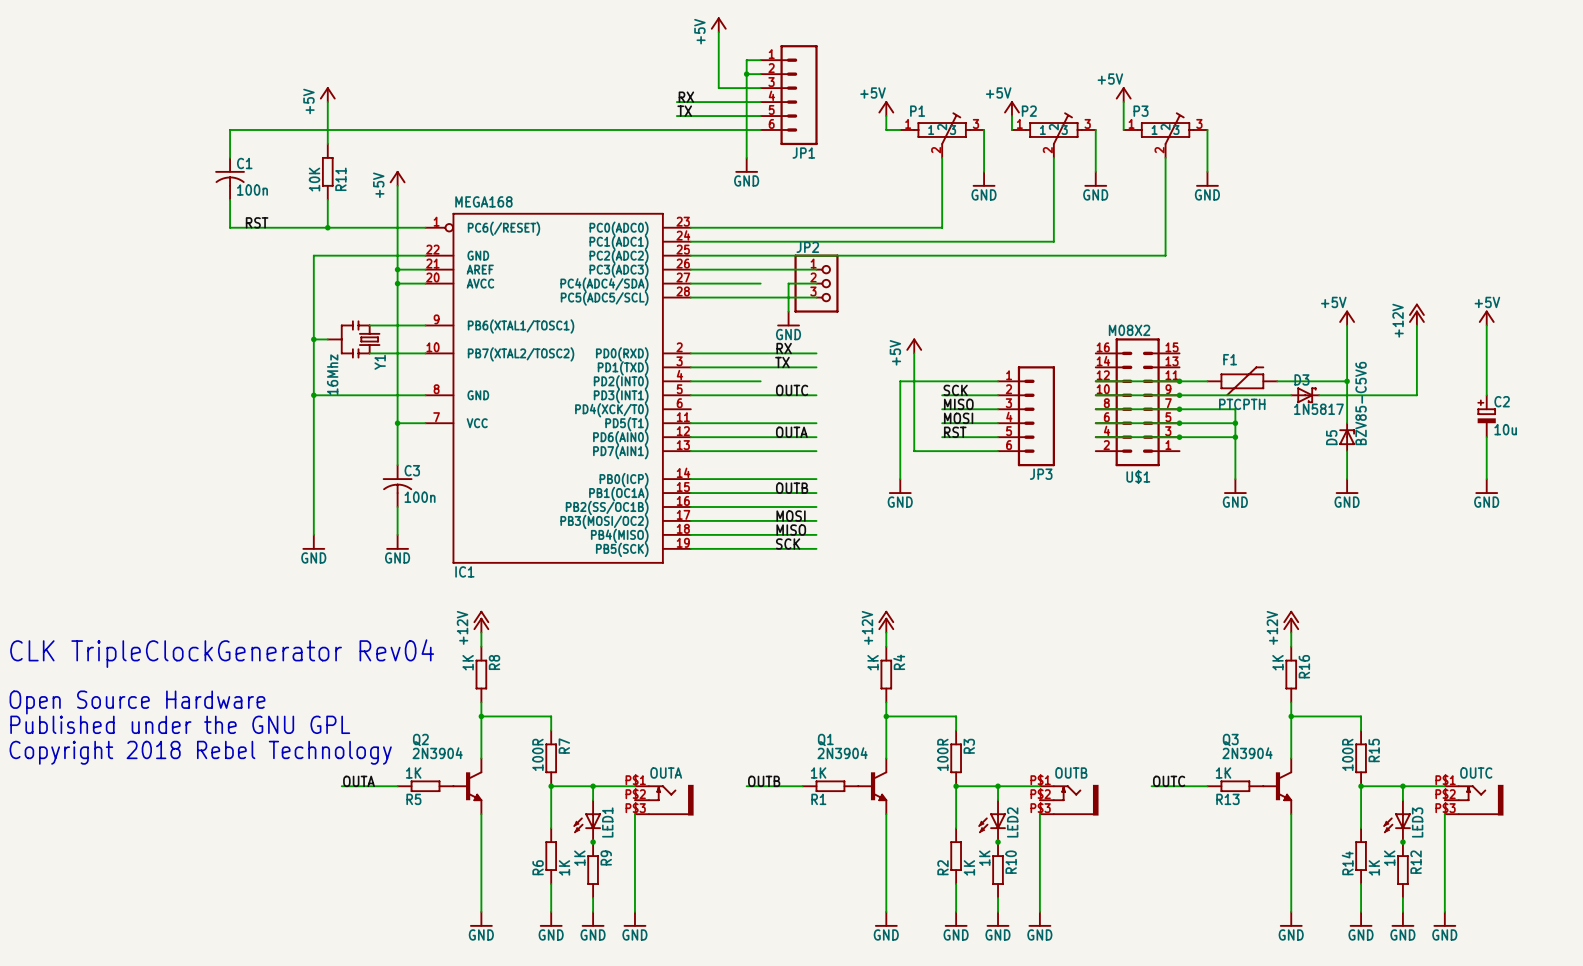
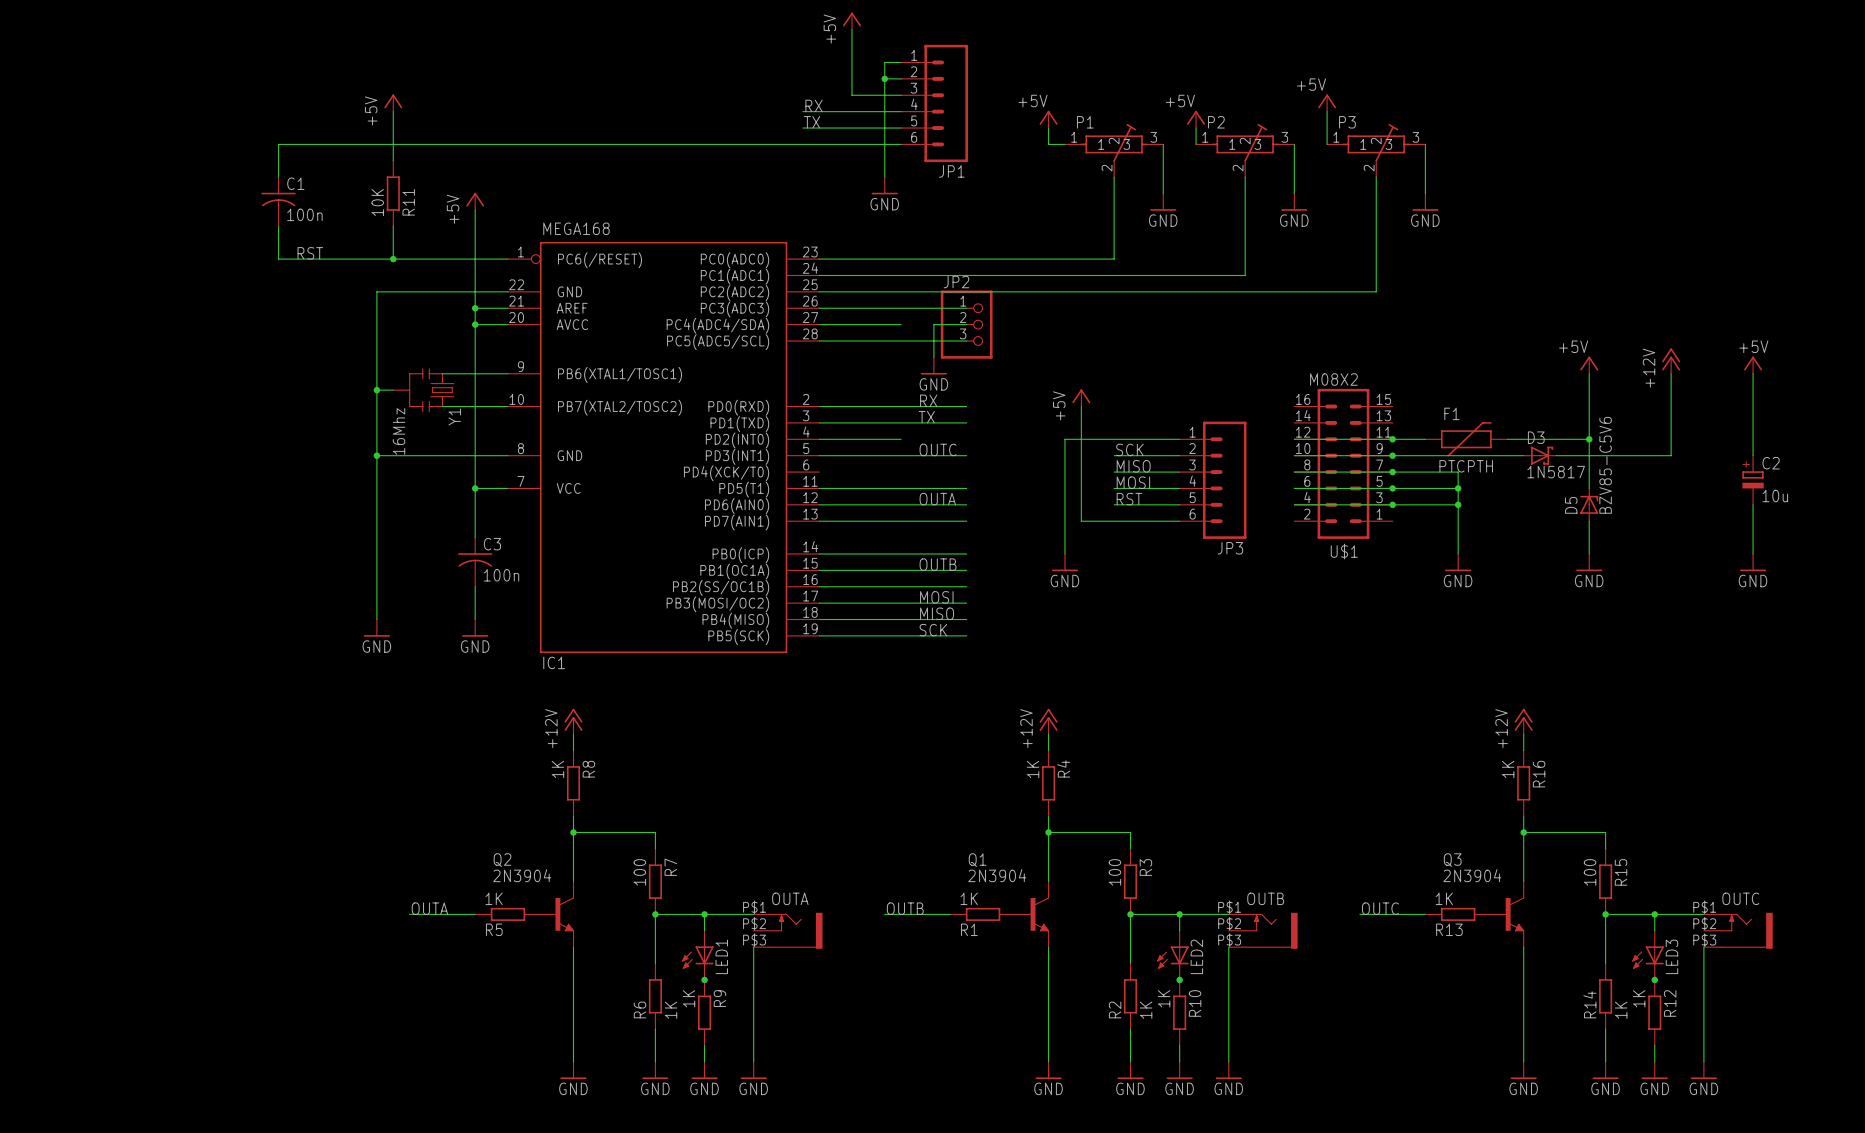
text: CLK TripleClockGenerator Rev04 (222, 653) -> none
text: Open Source Hardware (137, 702) -> none
text: Published under the GNU GPL (180, 724) -> none
text: Copyright 2018 Rebel Technology (200, 752) -> none
R7 value: 100R (537, 754) -> 100 (639, 872)
R3 value: 100R (942, 754) -> 100 (1114, 872)
R15 value: 100R (1347, 754) -> 100 (1590, 872)

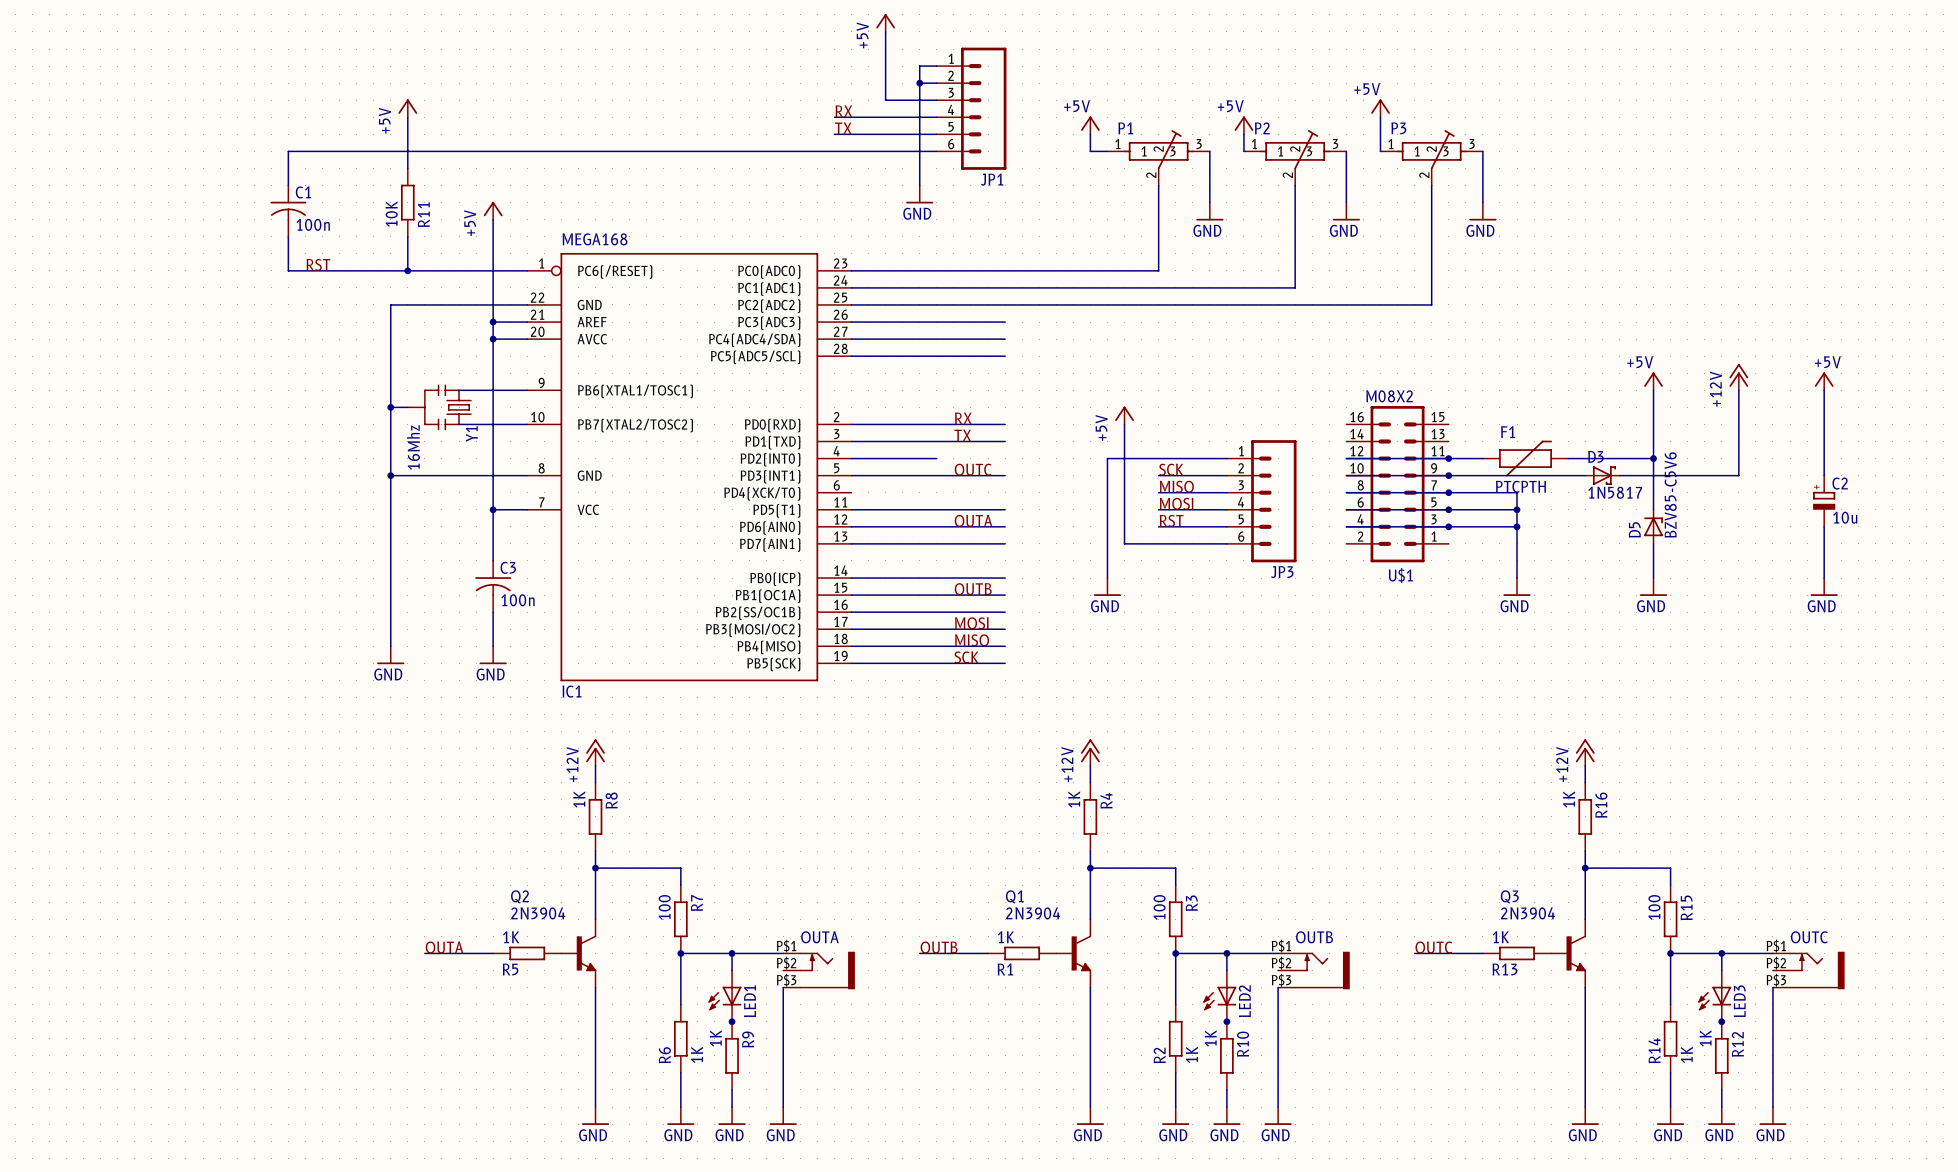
wire: (933, 324) (933, 357) -> (970, 339) (936, 339)
JP2: (966, 324) -> none
power symbol: GND (933, 365) -> none

